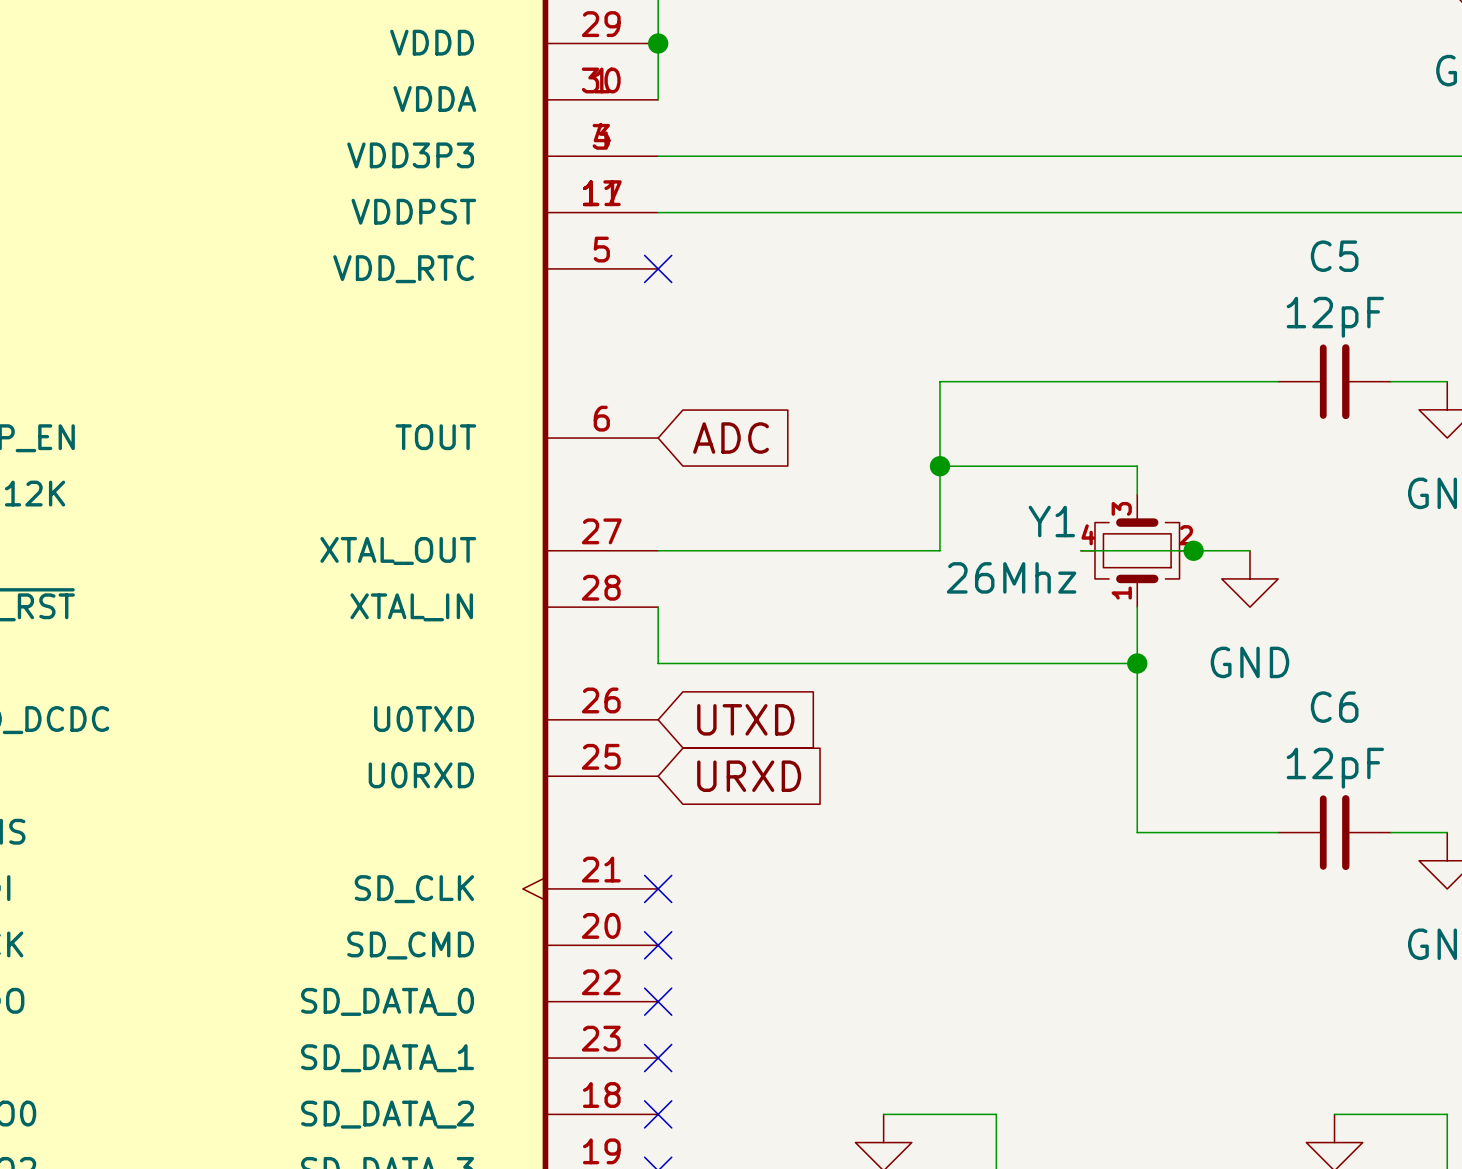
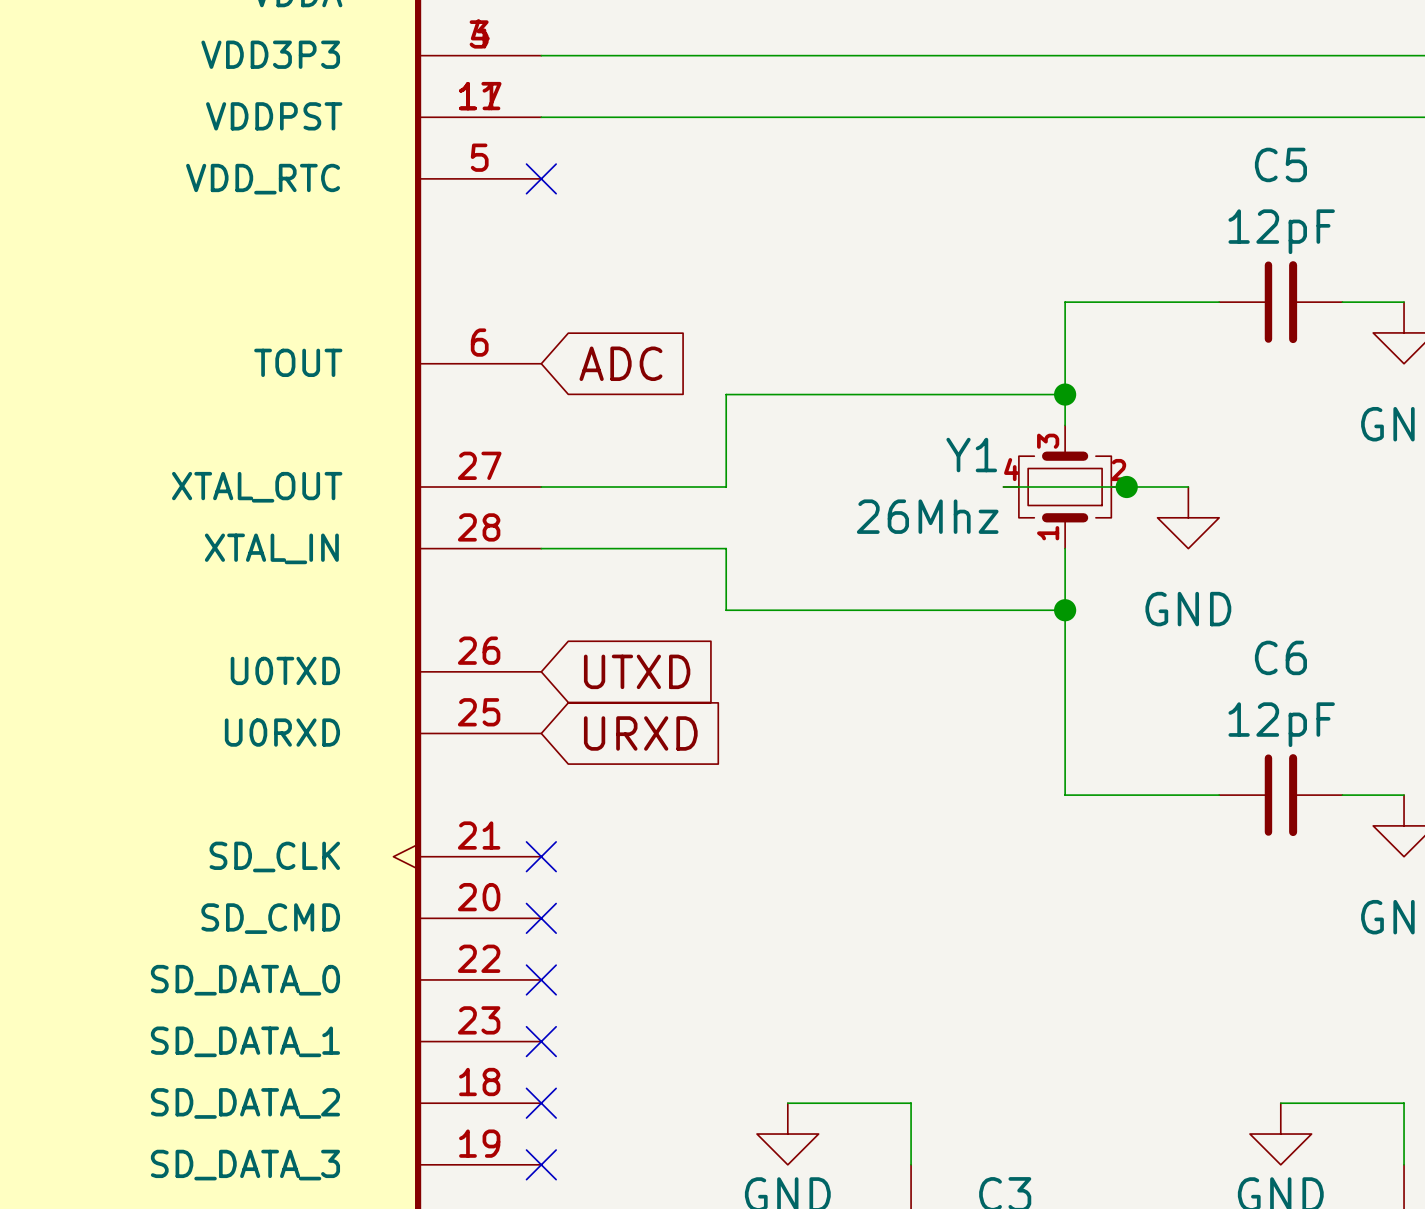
wire: (1137, 381) (939, 381) (939, 550) (827, 550) -> (849, 394) (726, 394) (726, 486)
wire: none -> (1065, 302) (1065, 394)
junction: (939, 466) -> none
junction: none -> (1065, 394)
wire: (658, 607) (658, 663) (827, 663) -> (541, 548) (726, 548) (726, 610)

